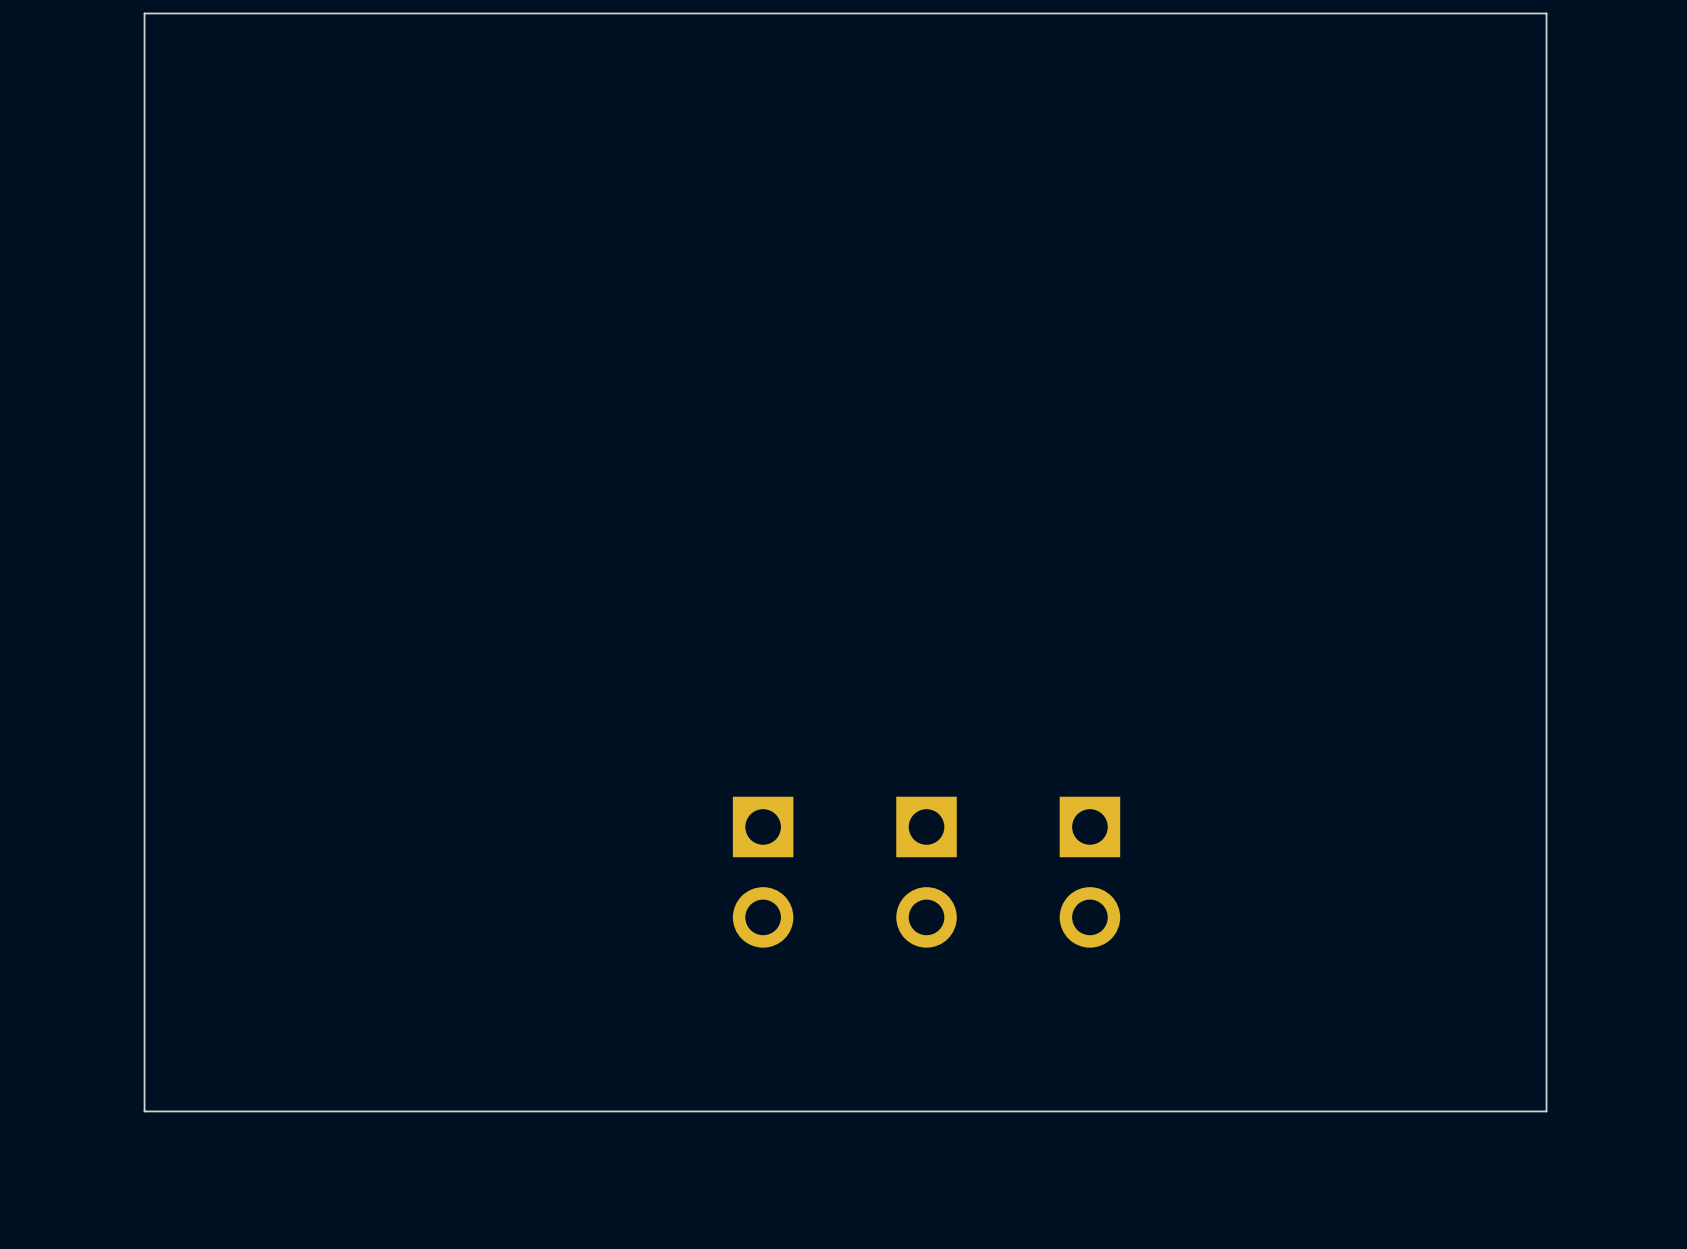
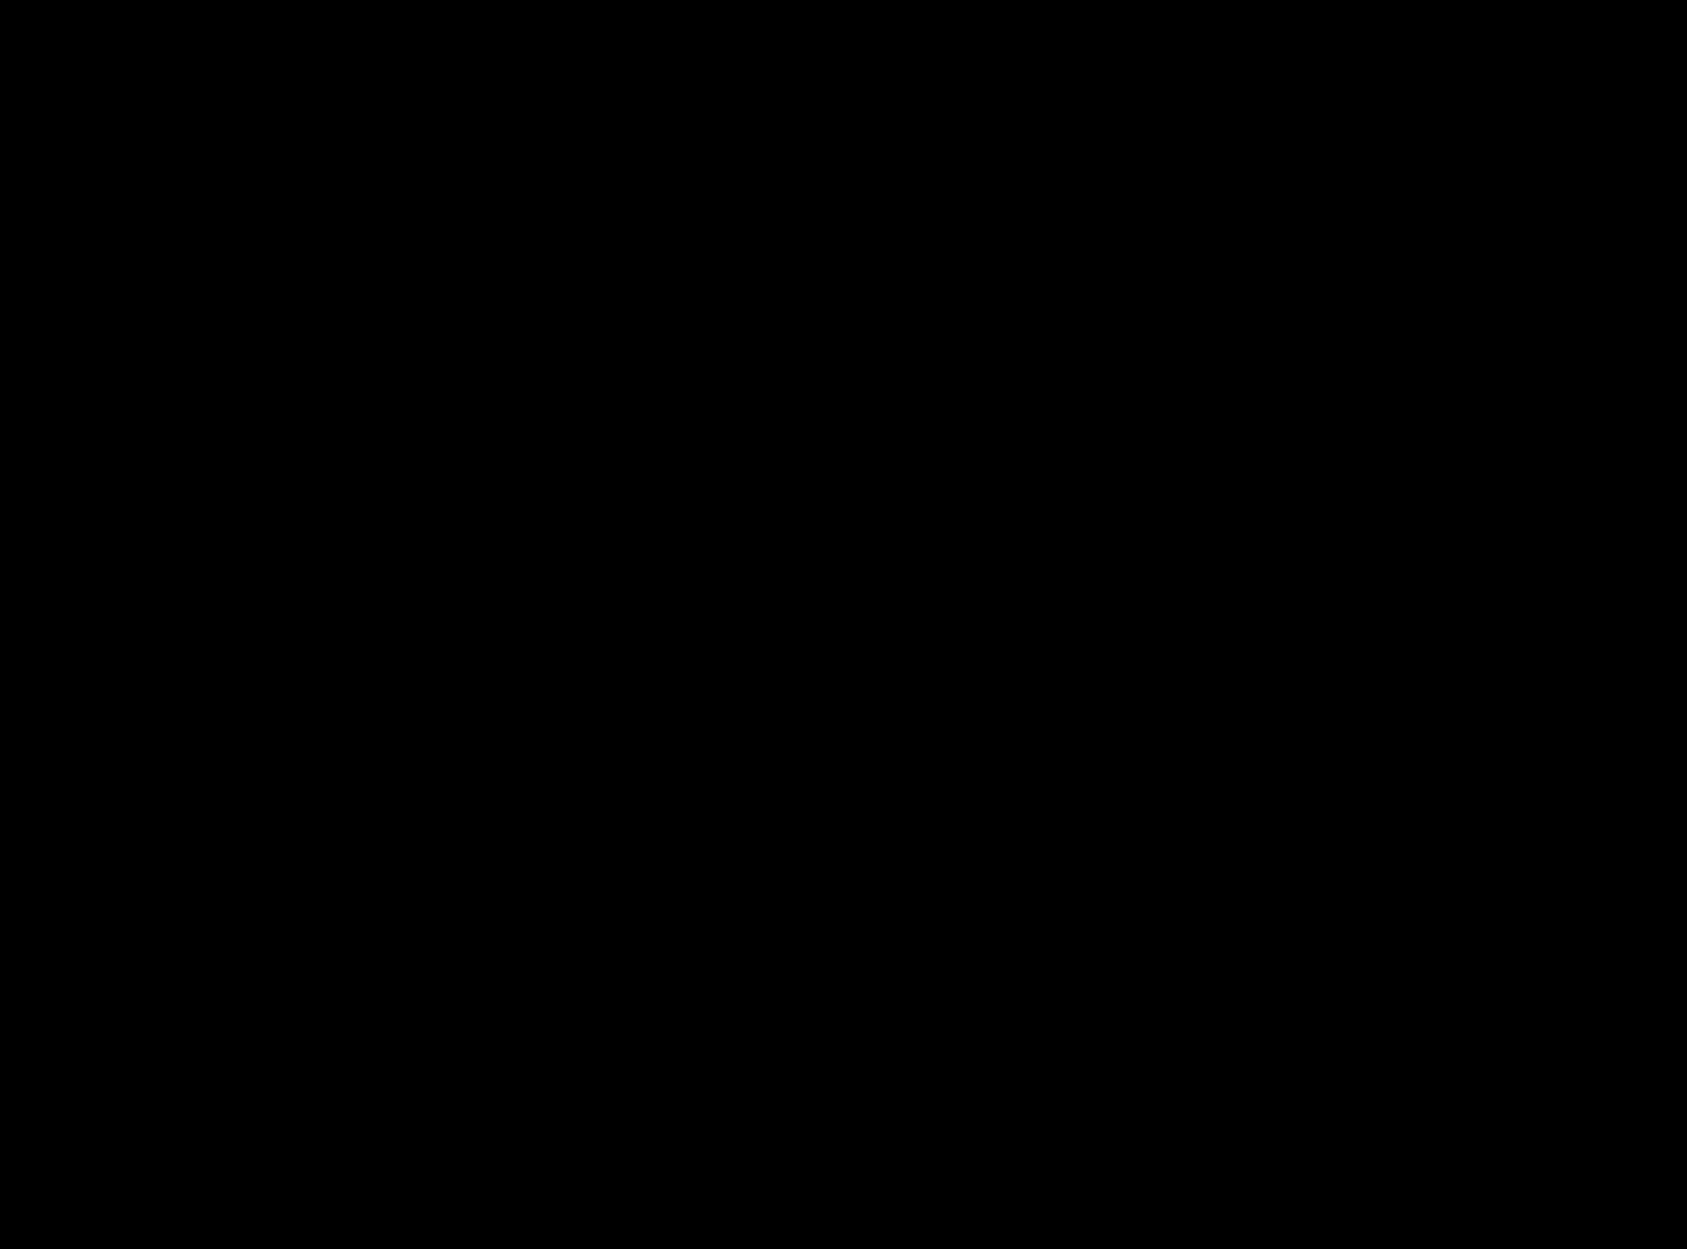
board edge: (1546, 13) (144, 13) (144, 1111) (1546, 1111) (1546, 13) -> none
part: (763, 872) -> none
part: (926, 872) -> none
part: (1089, 872) -> none

